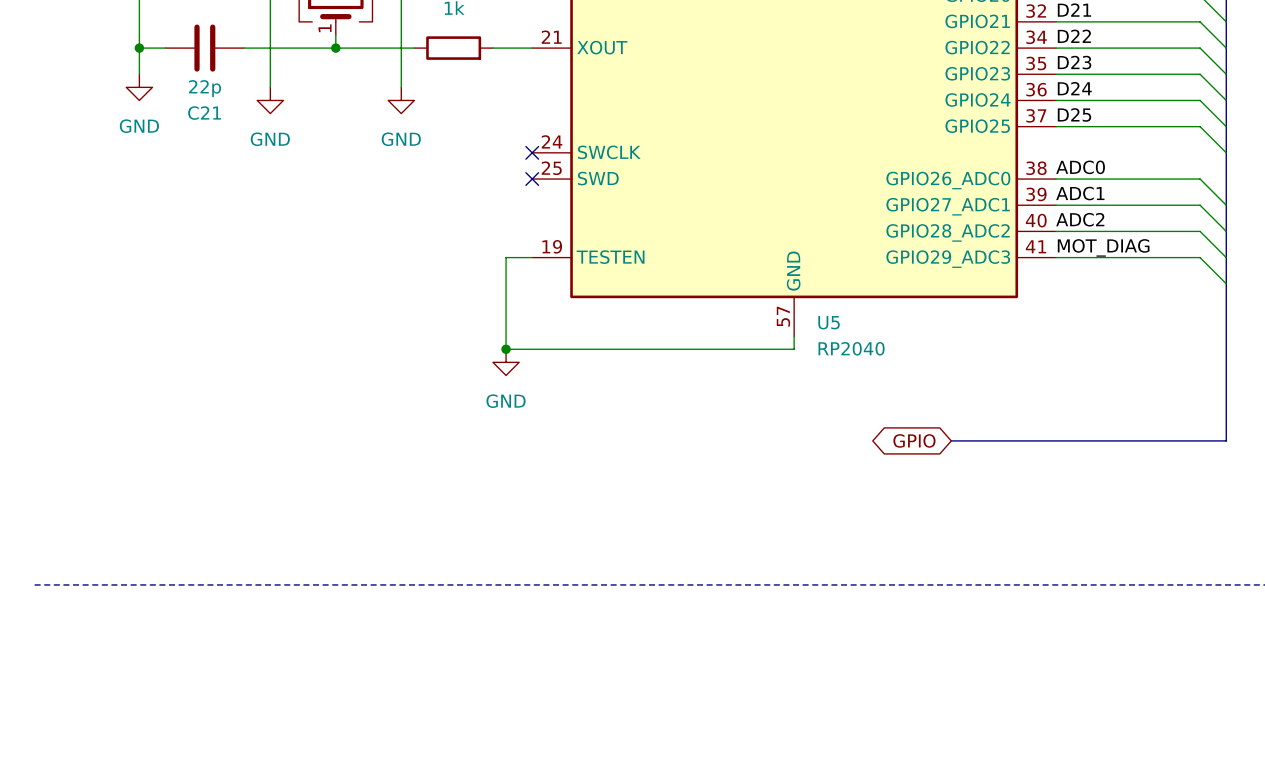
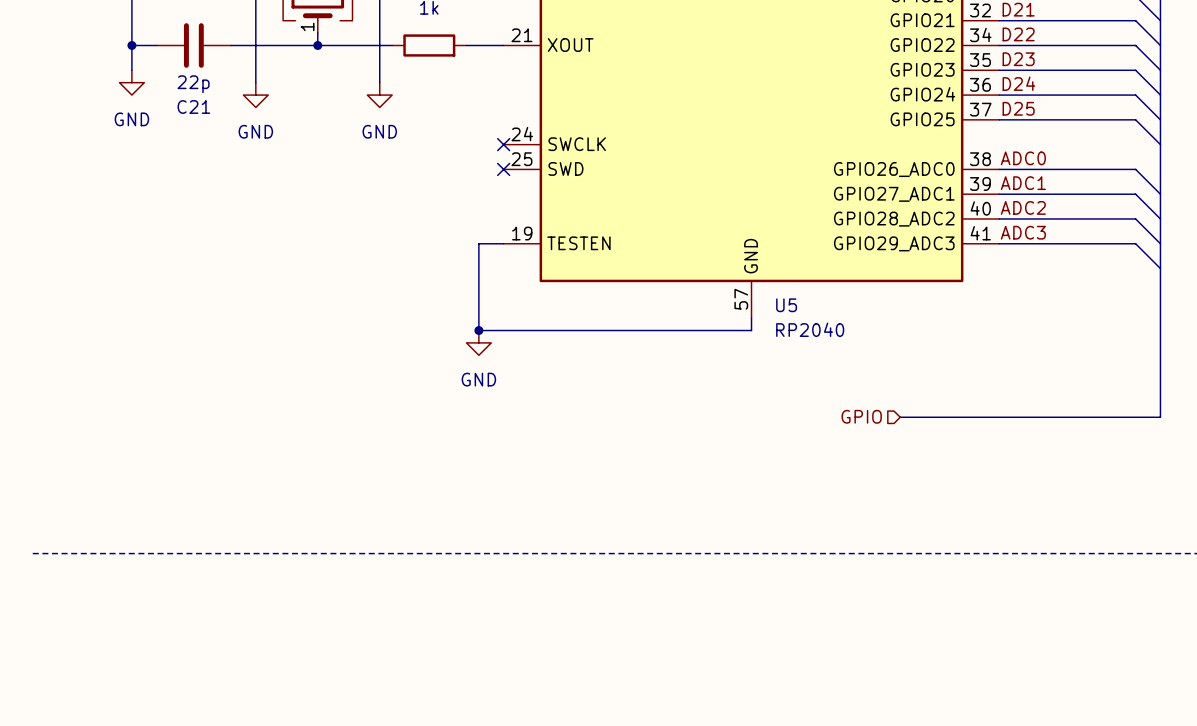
label: MOT_DIAG (1103, 247) -> ADC3 (1023, 232)
hierarchical label: none -> GPIO (861, 416)
global label: GPIO (914, 440) -> none

